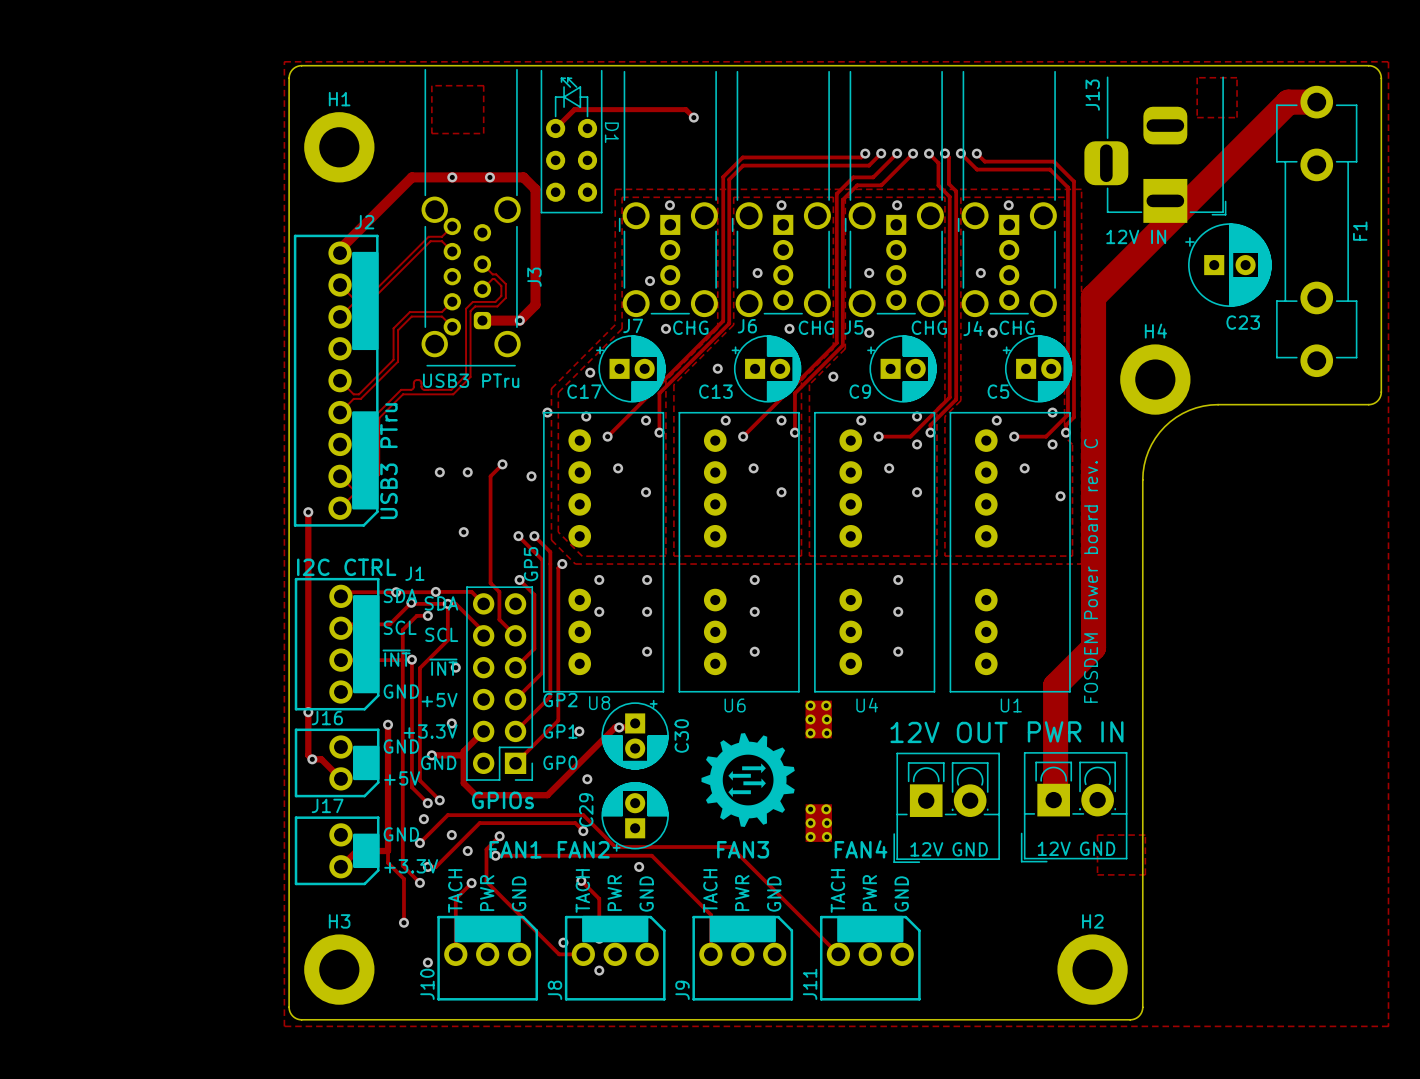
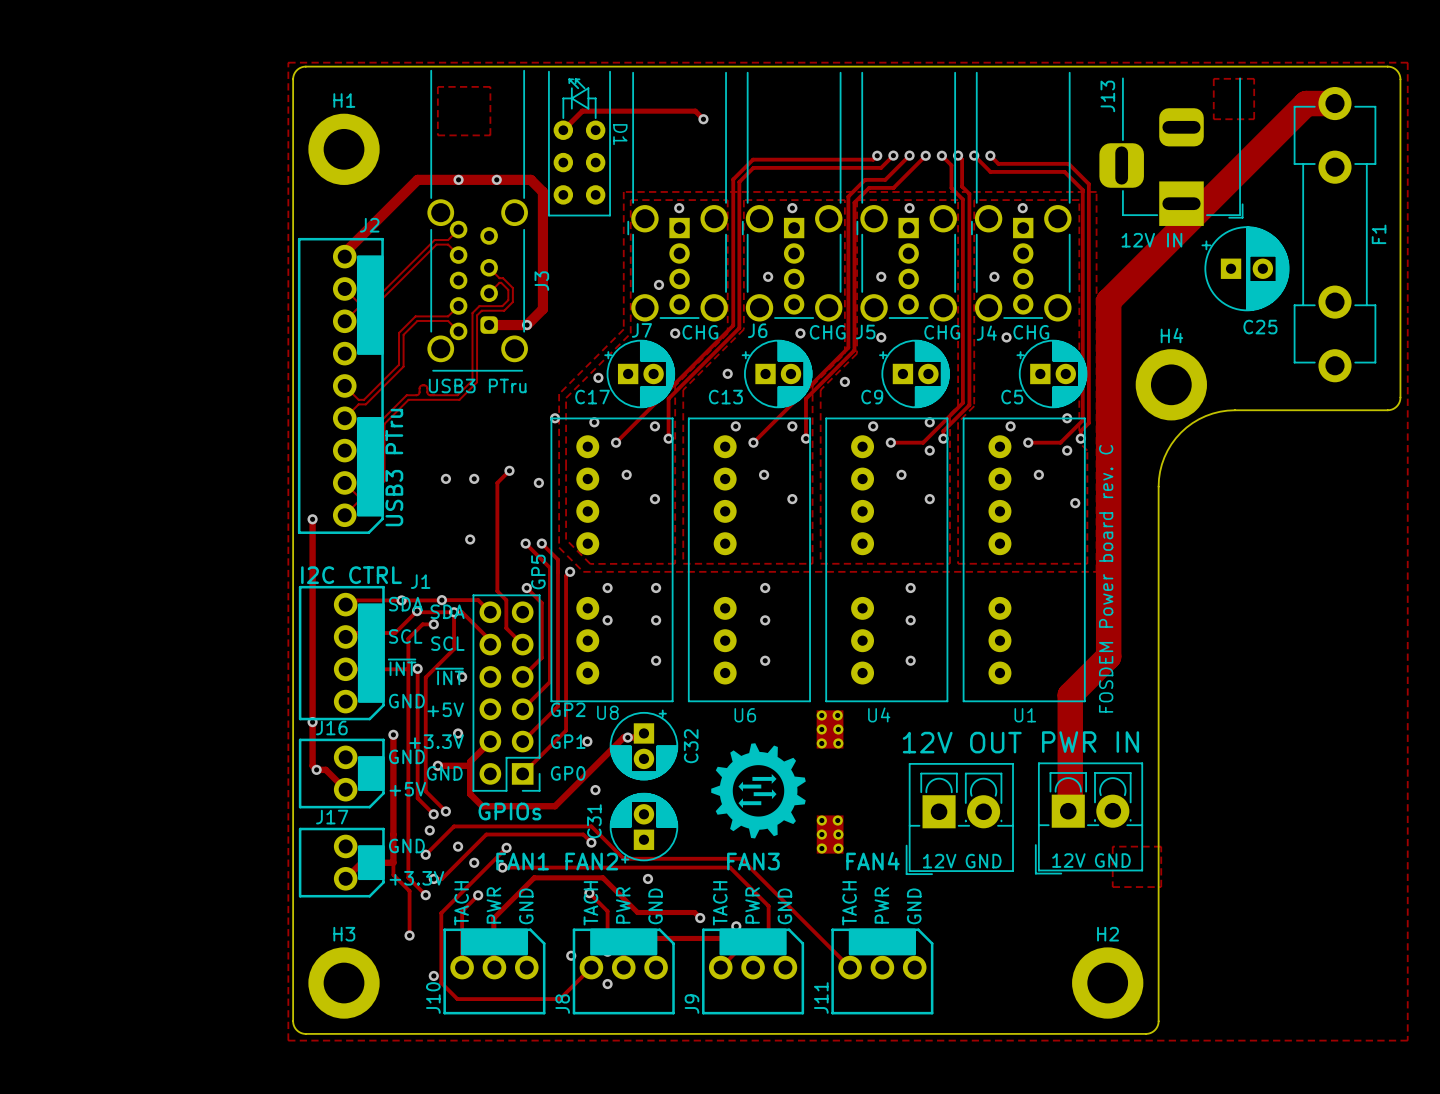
C23 name: C23 (1243, 322) -> C25 (1260, 327)
C30 name: C30 (681, 735) -> C32 (691, 746)
C29 name: C29 (586, 810) -> C31 (594, 821)
track: (486, 849) (486, 881) (559, 954) (583, 954) -> (493, 861) (441, 913) (441, 982) (457, 999) (559, 999) (591, 967)
track: (651, 855) (710, 914) (710, 954) -> (660, 867) (730, 867) (768, 906) (768, 938) (760, 946) (741, 946) (720, 967)
track: none -> (700, 918) (694, 912) (637, 912) (602, 877) (534, 877) (493, 918) (494, 967)
via: none -> (700, 918)
track: none -> (736, 926) (724, 938) (631, 938) (623, 945) (623, 967)
via: none -> (736, 926)

